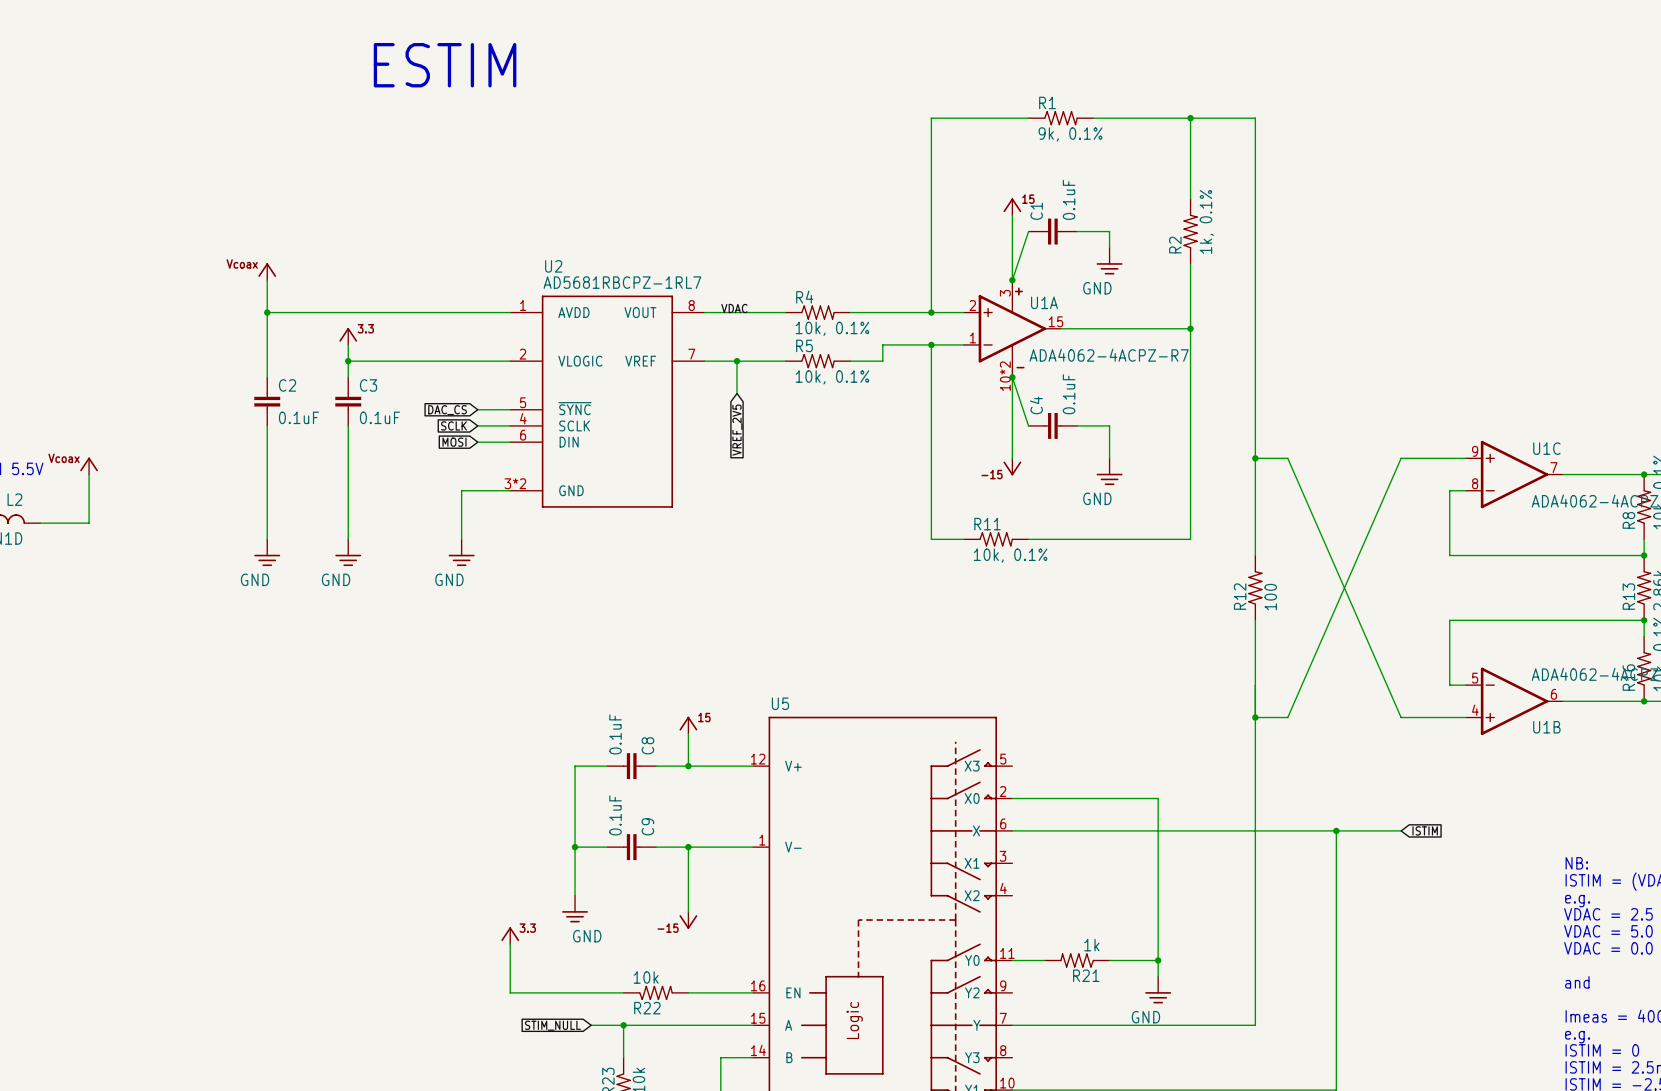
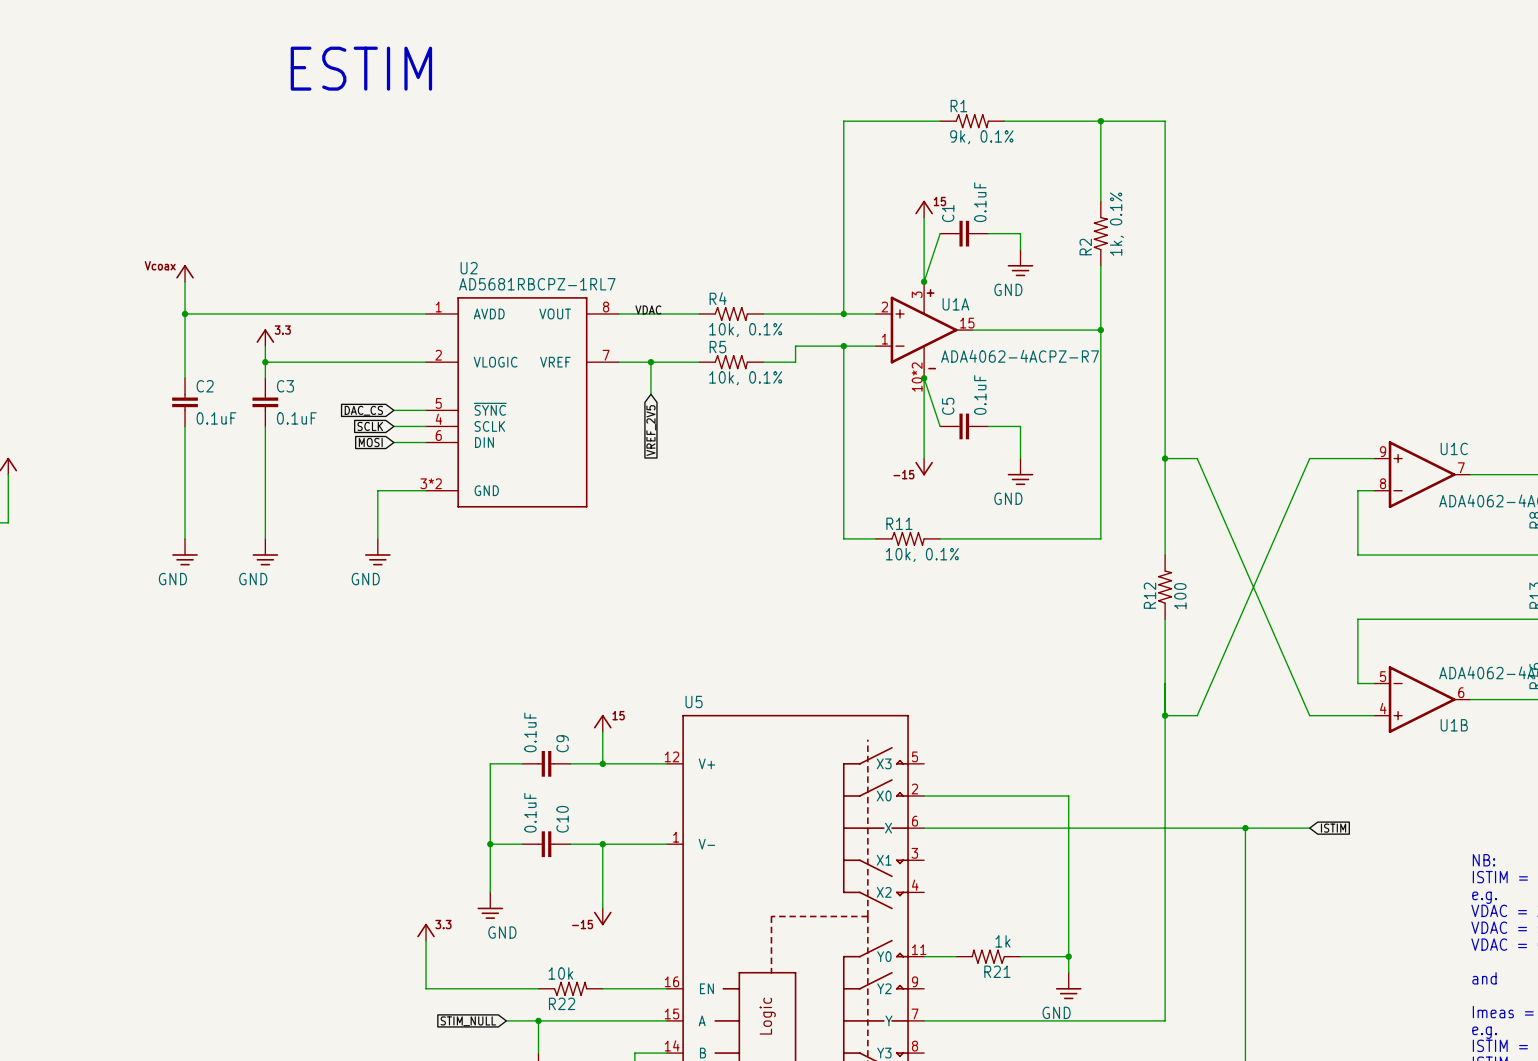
C4 name: C4 (1036, 405) -> C5 (948, 406)
C8 name: C8 (647, 745) -> C9 (562, 743)
C9 name: C9 (647, 826) -> C10 (562, 819)

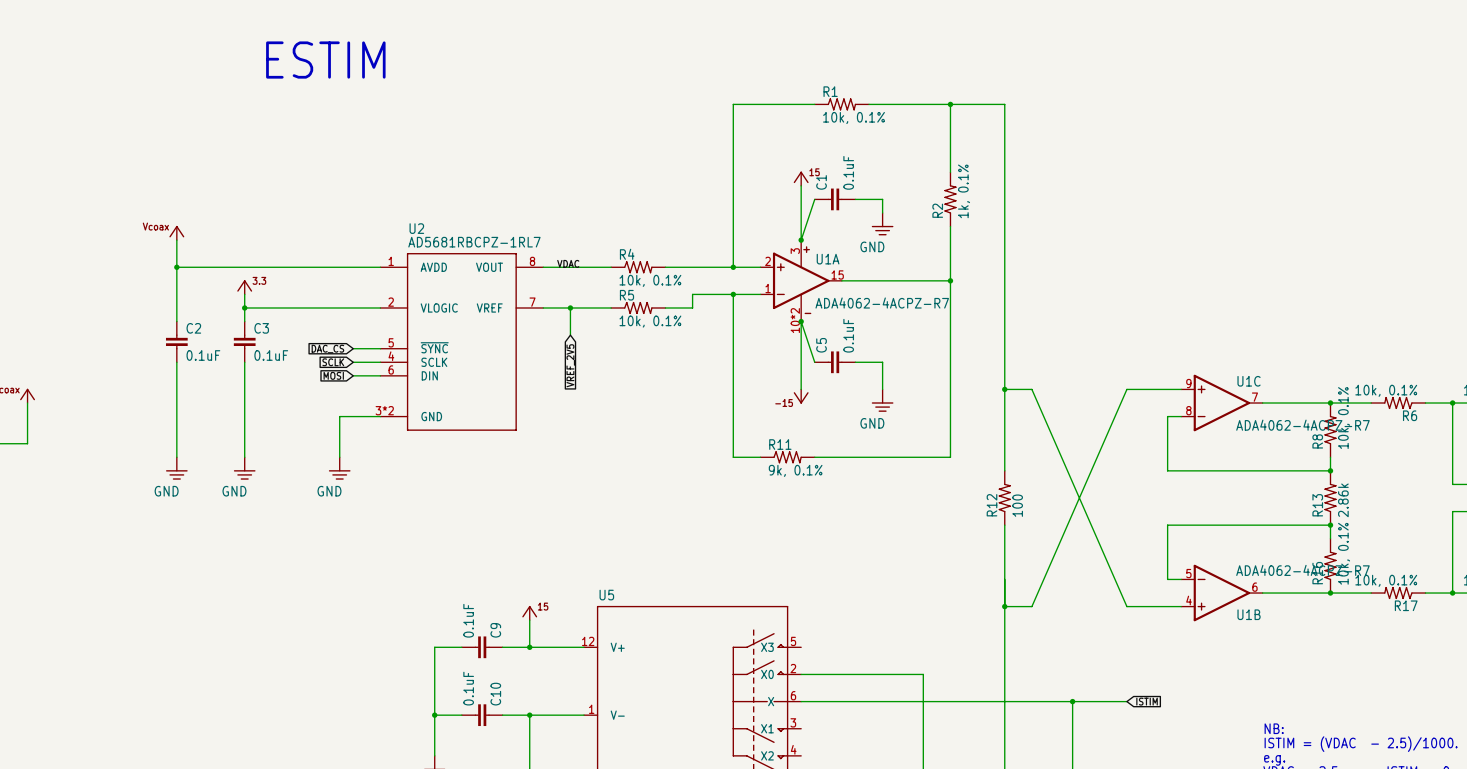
R1 value: 9k, 0.1% (981, 137) -> 10k, 0.1% (853, 117)
R11 value: 10k, 0.1% (922, 554) -> 9k, 0.1% (795, 470)

